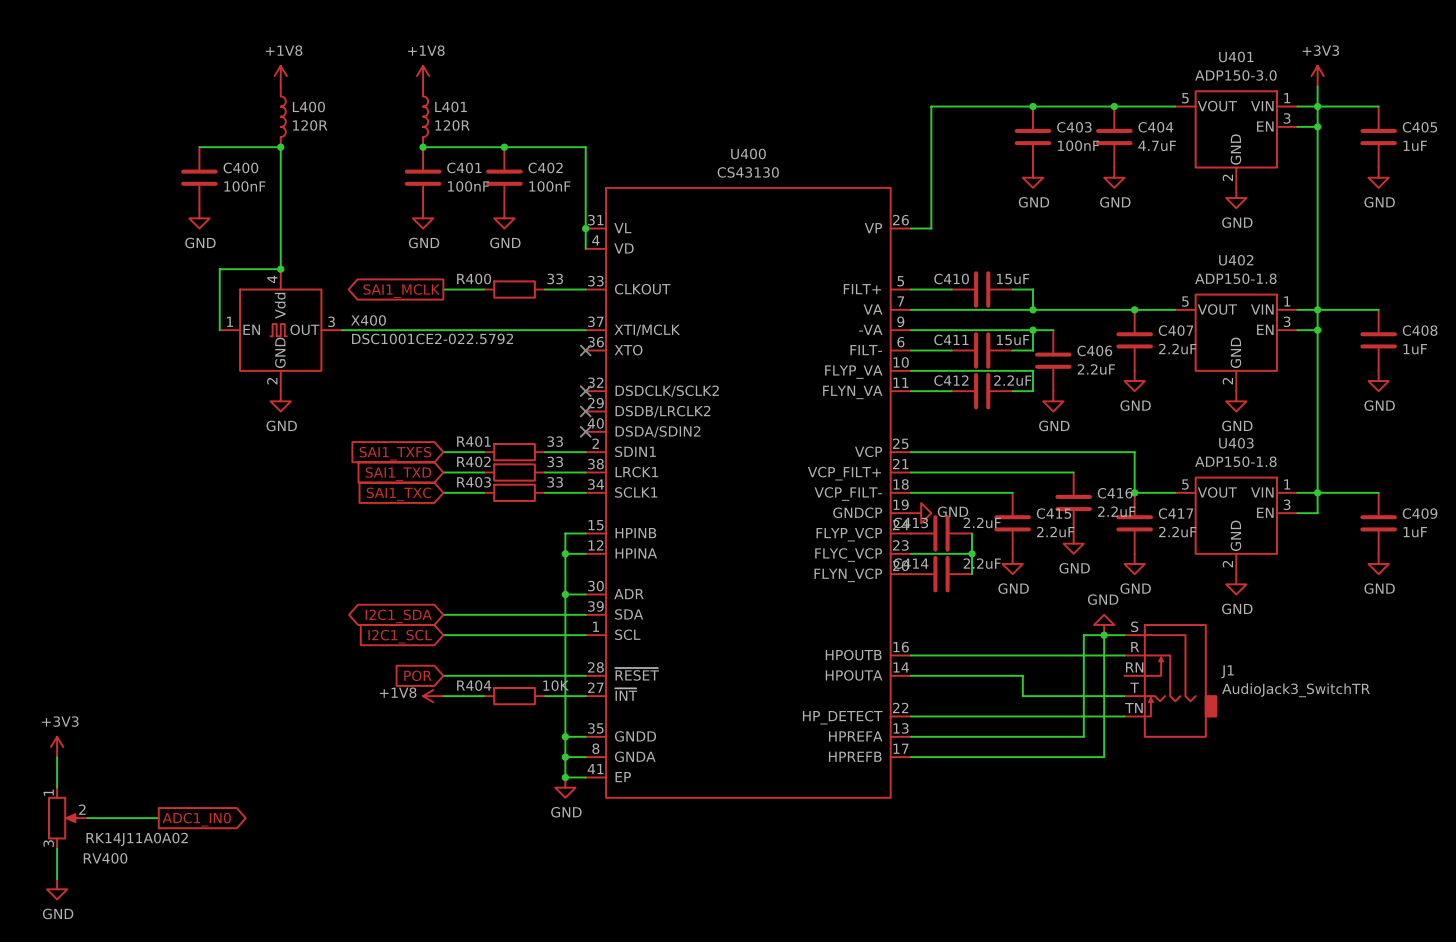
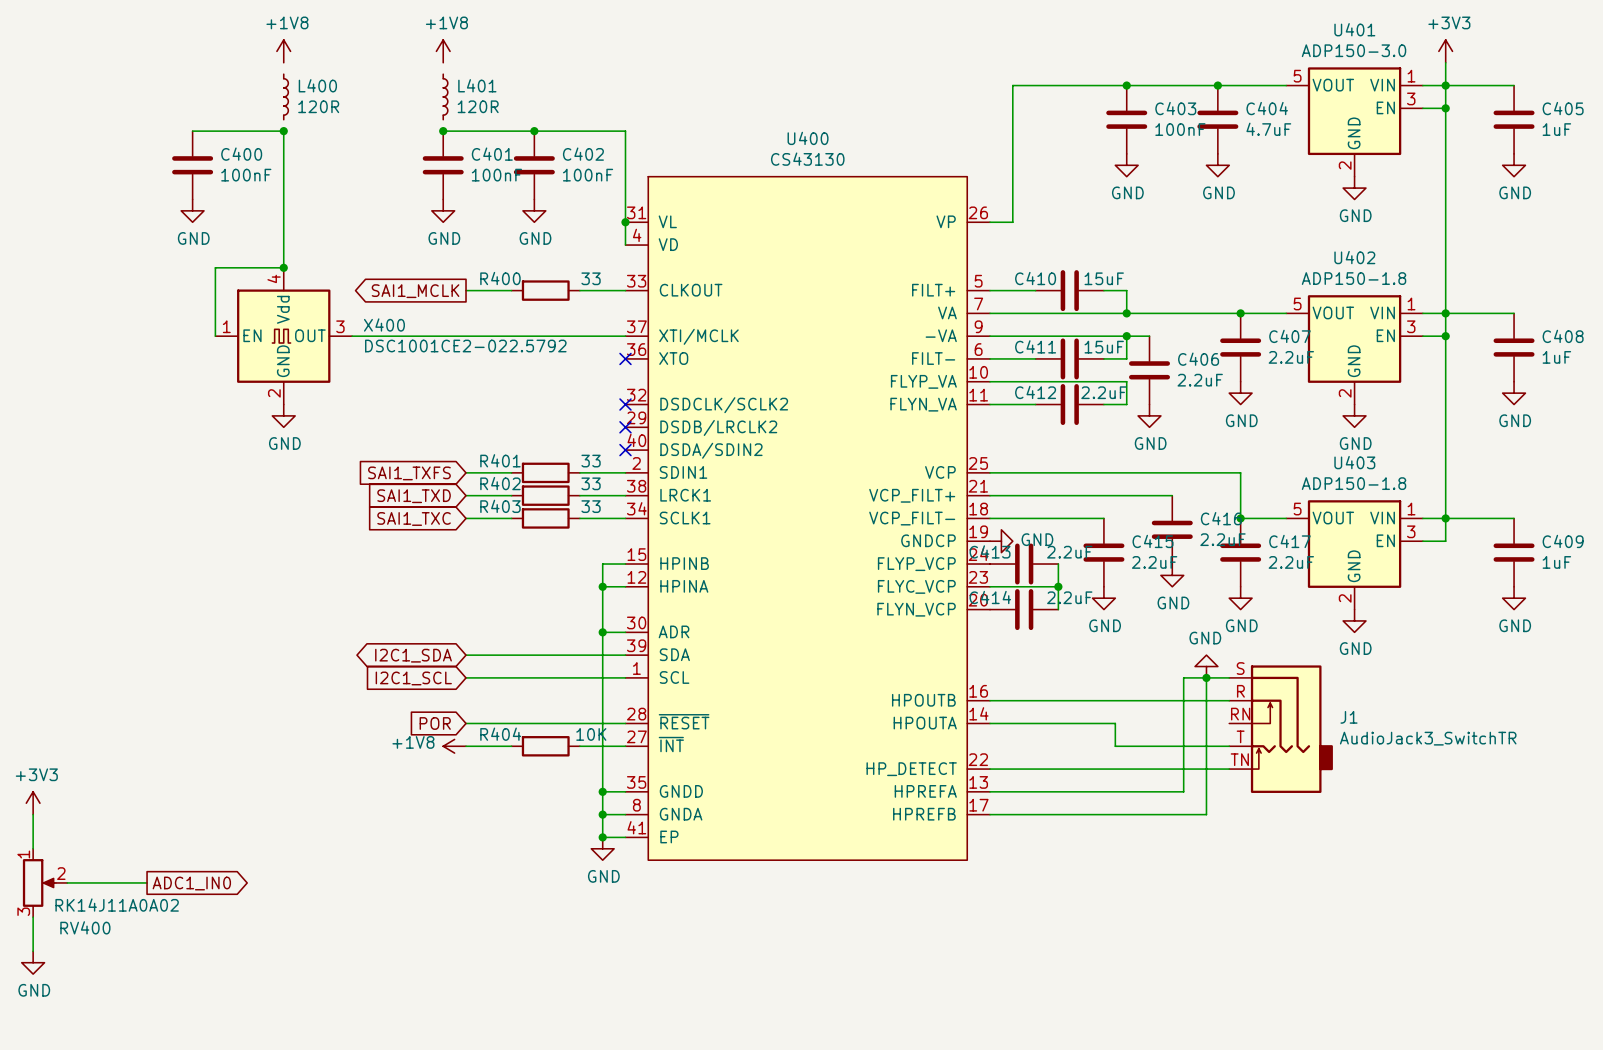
L400 symbol: [280, 86, 286, 148] -> [283, 74, 289, 120]
L401 symbol: [423, 86, 429, 148] -> [443, 74, 448, 120]

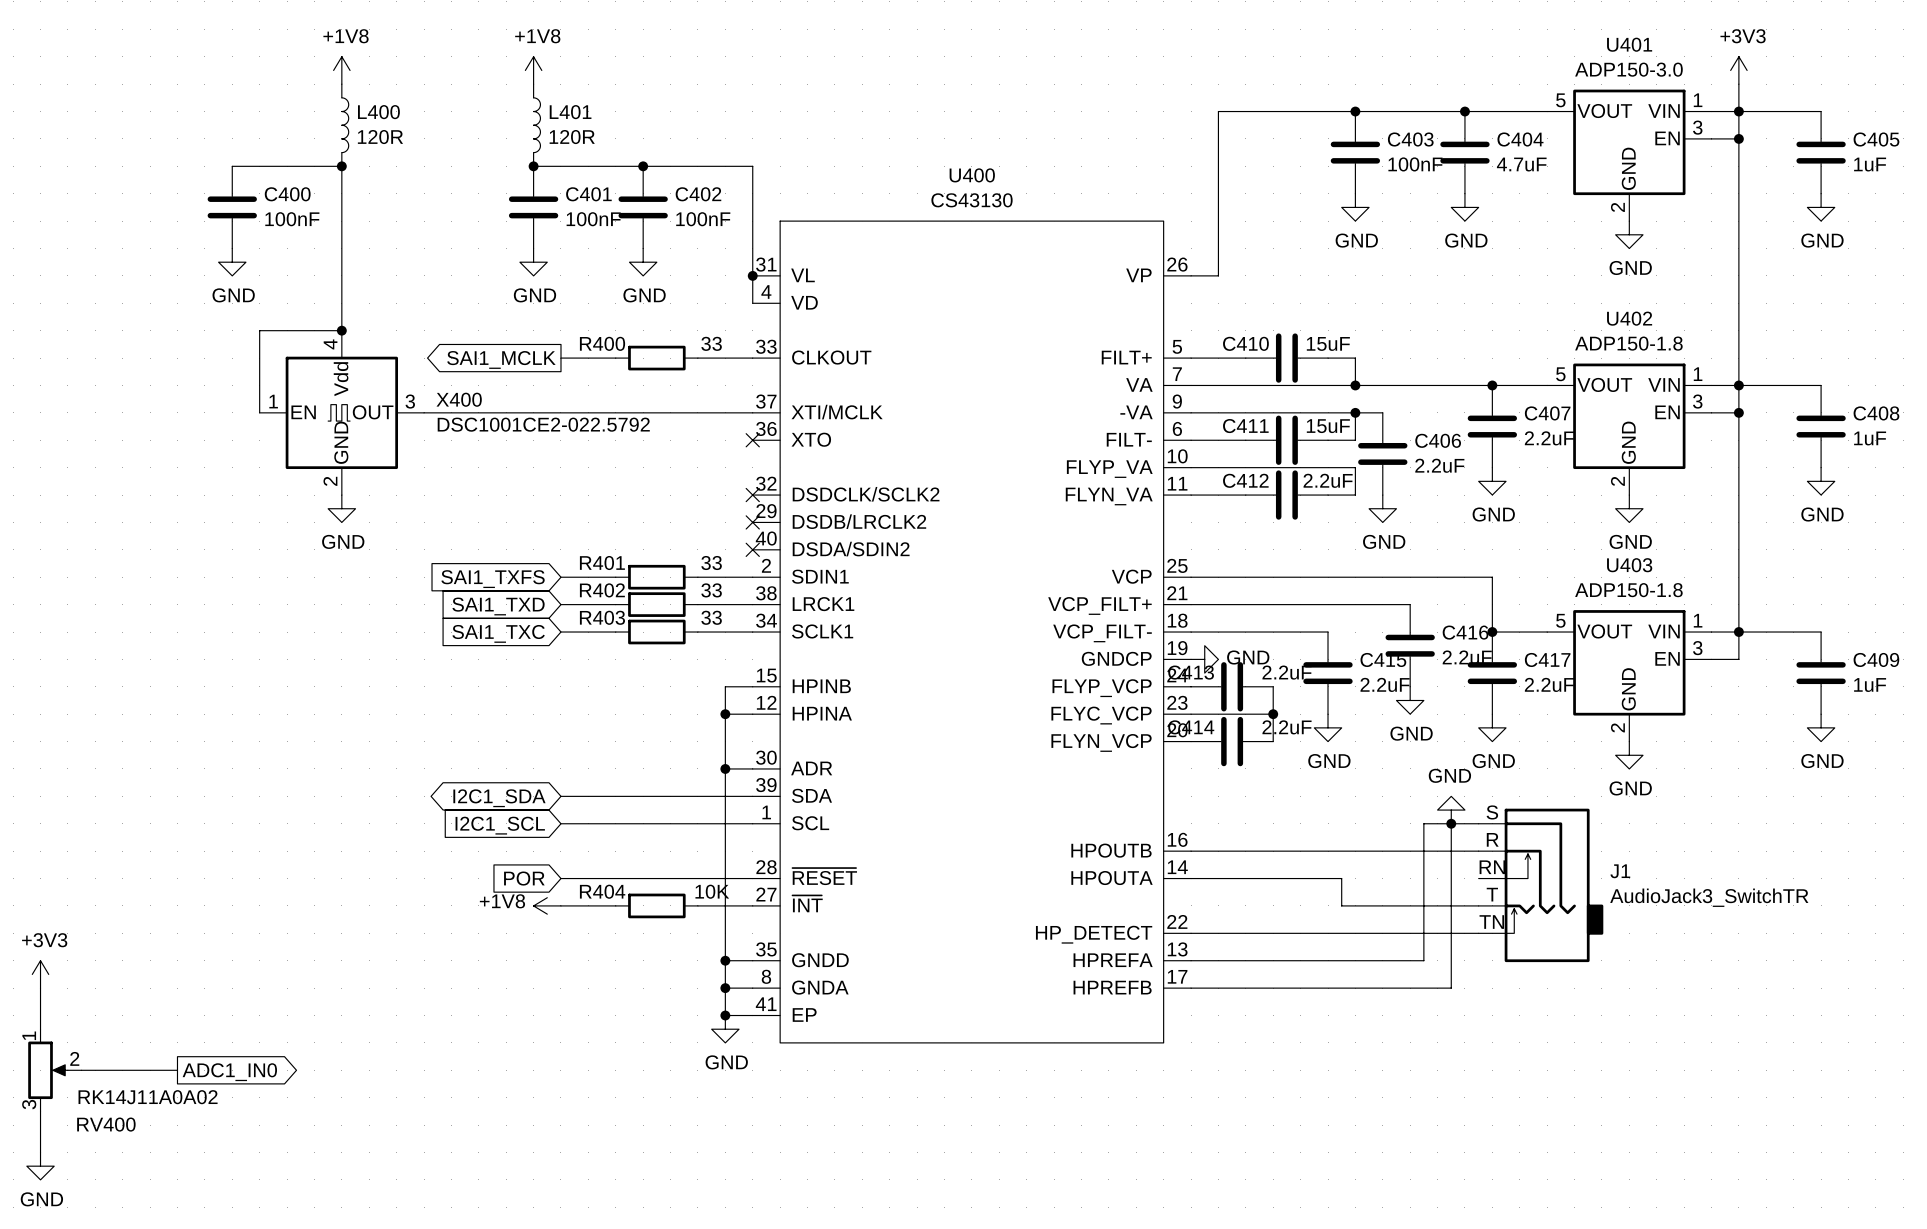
L400 symbol: [283, 74, 289, 120] -> [341, 84, 349, 167]
L401 symbol: [443, 74, 448, 120] -> [533, 84, 541, 167]

